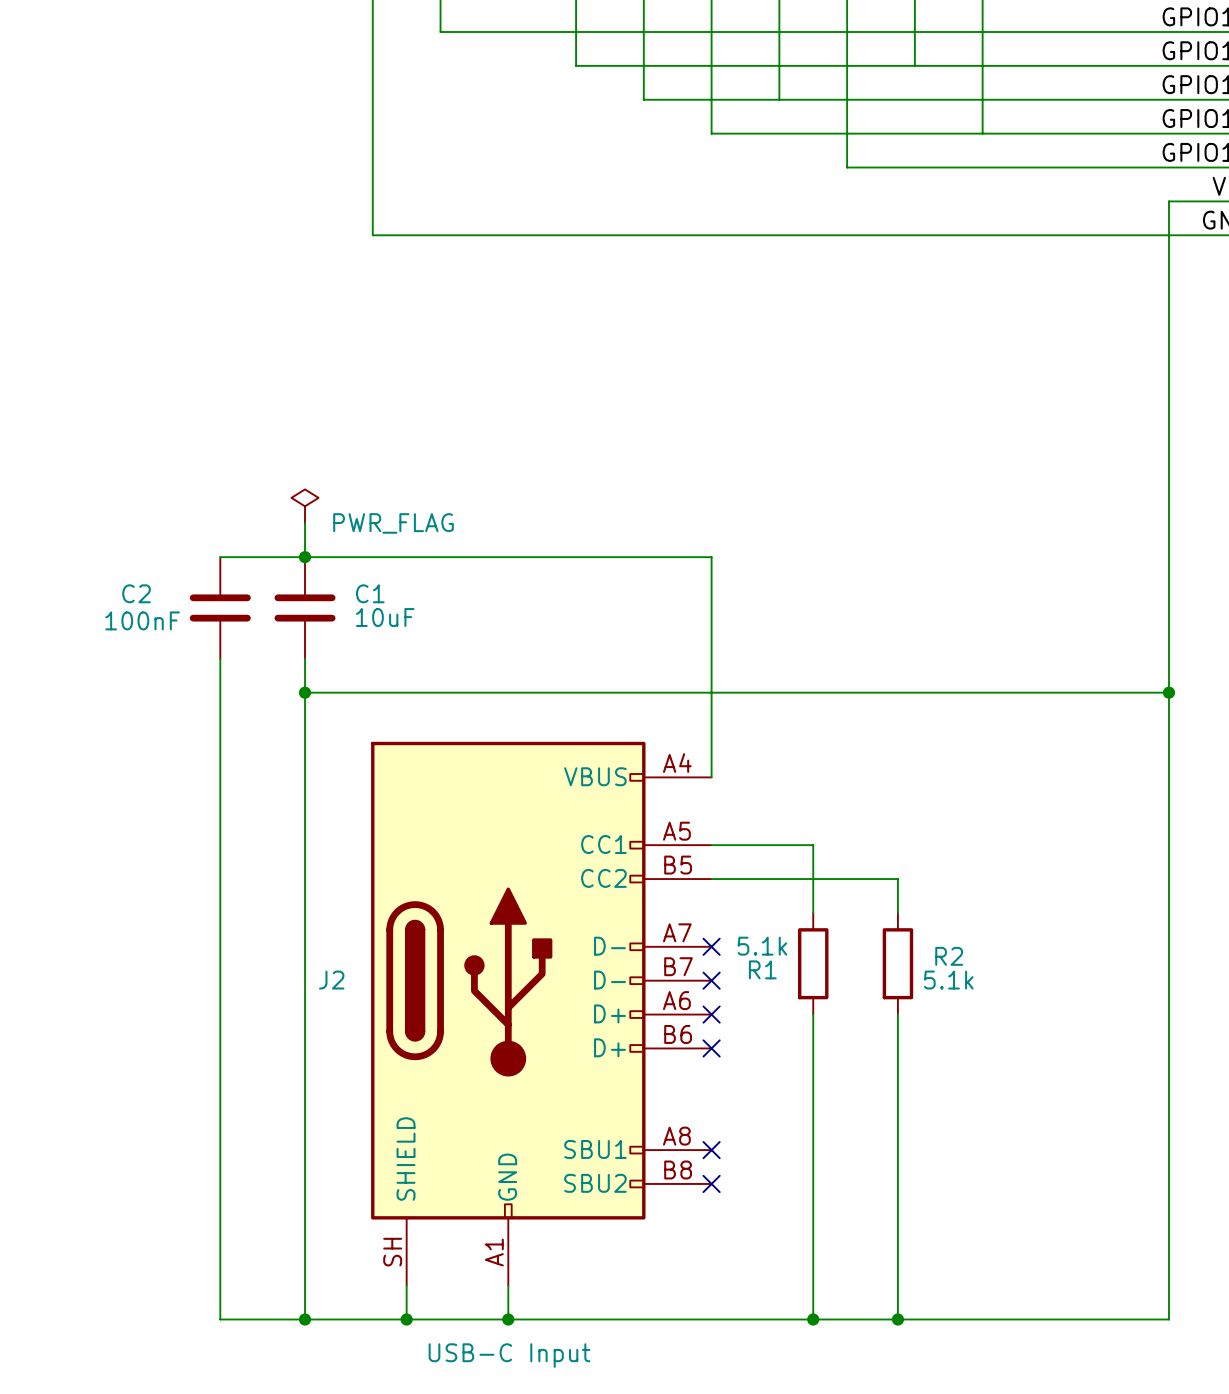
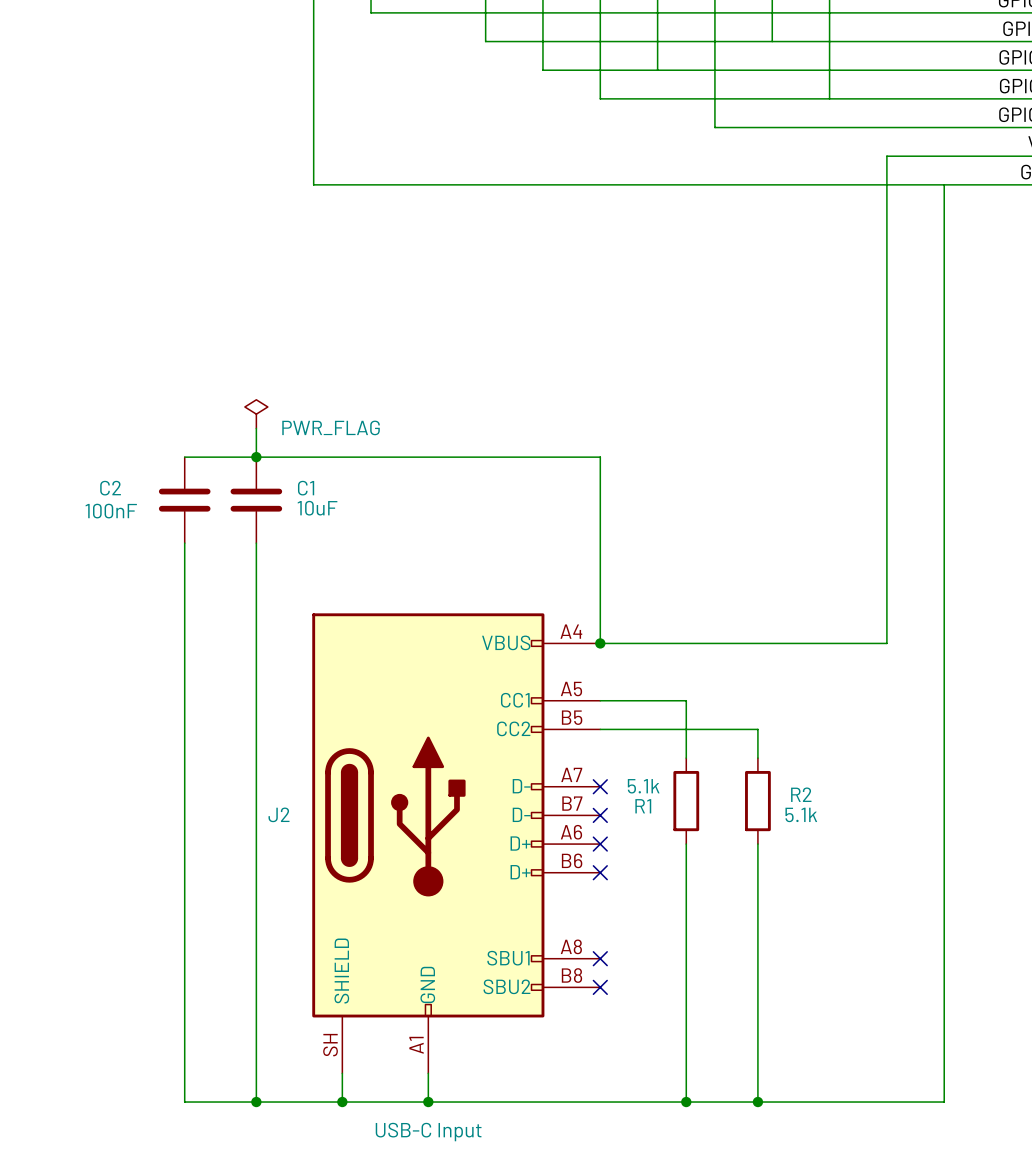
wire: (1168, 201) (1168, 1319) (1118, 1319) -> (944, 184) (944, 1102)
wire: none -> (987, 156) (886, 156) (886, 643) (600, 643)
wire: (305, 692) (1168, 692) -> none
junction: (305, 692) -> none
junction: (1168, 692) -> none
junction: none -> (600, 643)

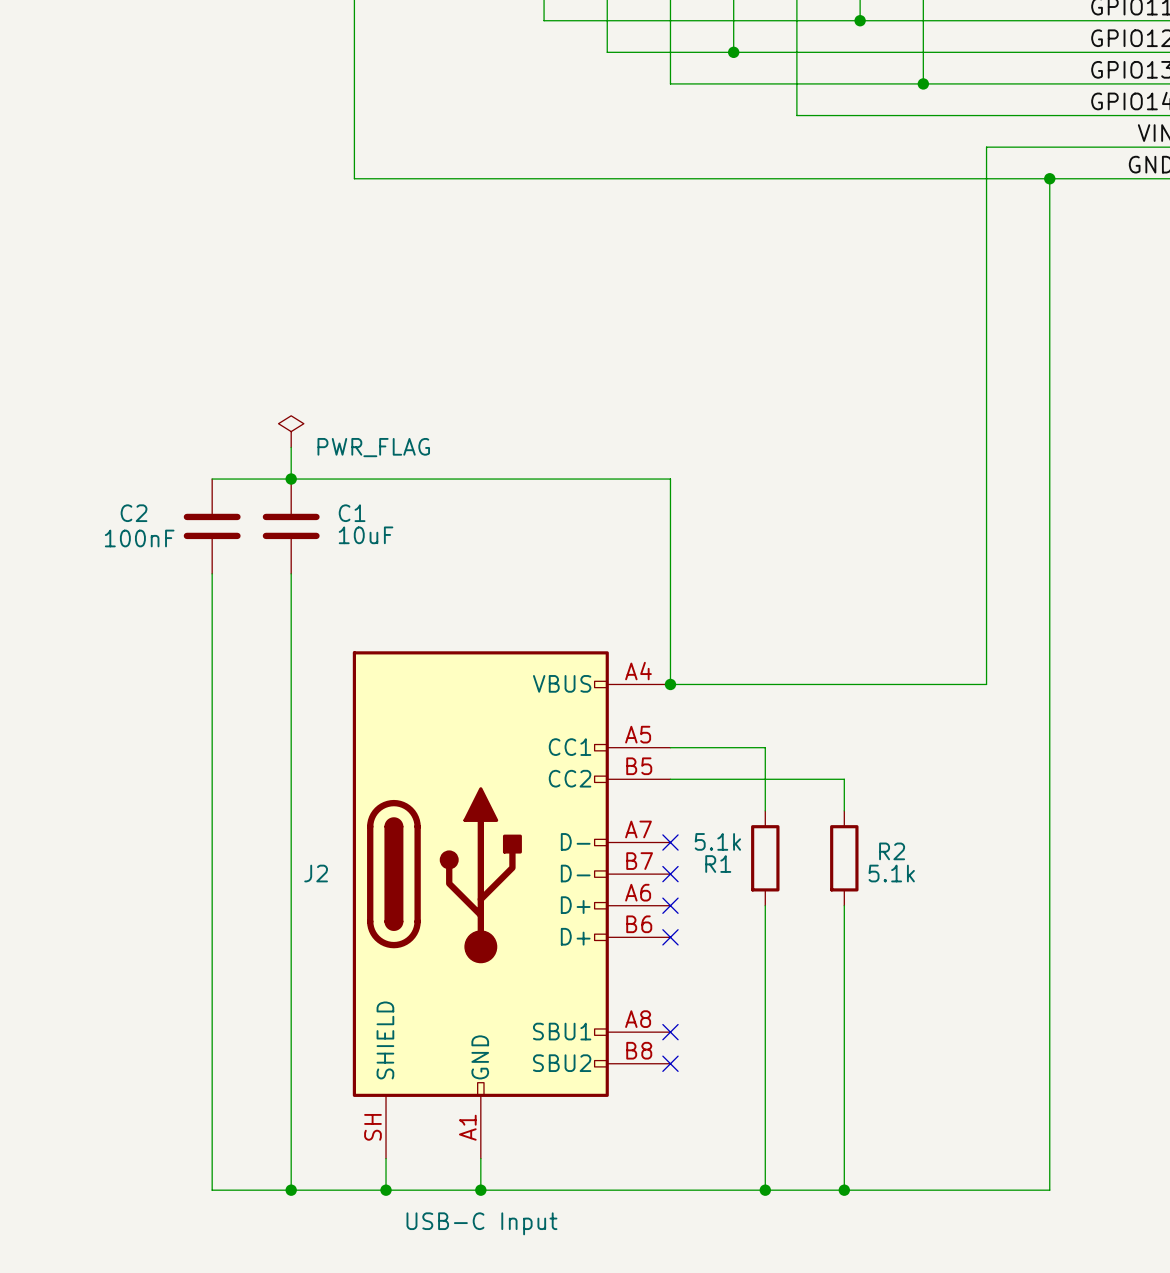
junction: none -> (860, 20)
junction: none -> (733, 52)
junction: none -> (923, 83)
junction: none -> (1049, 178)

